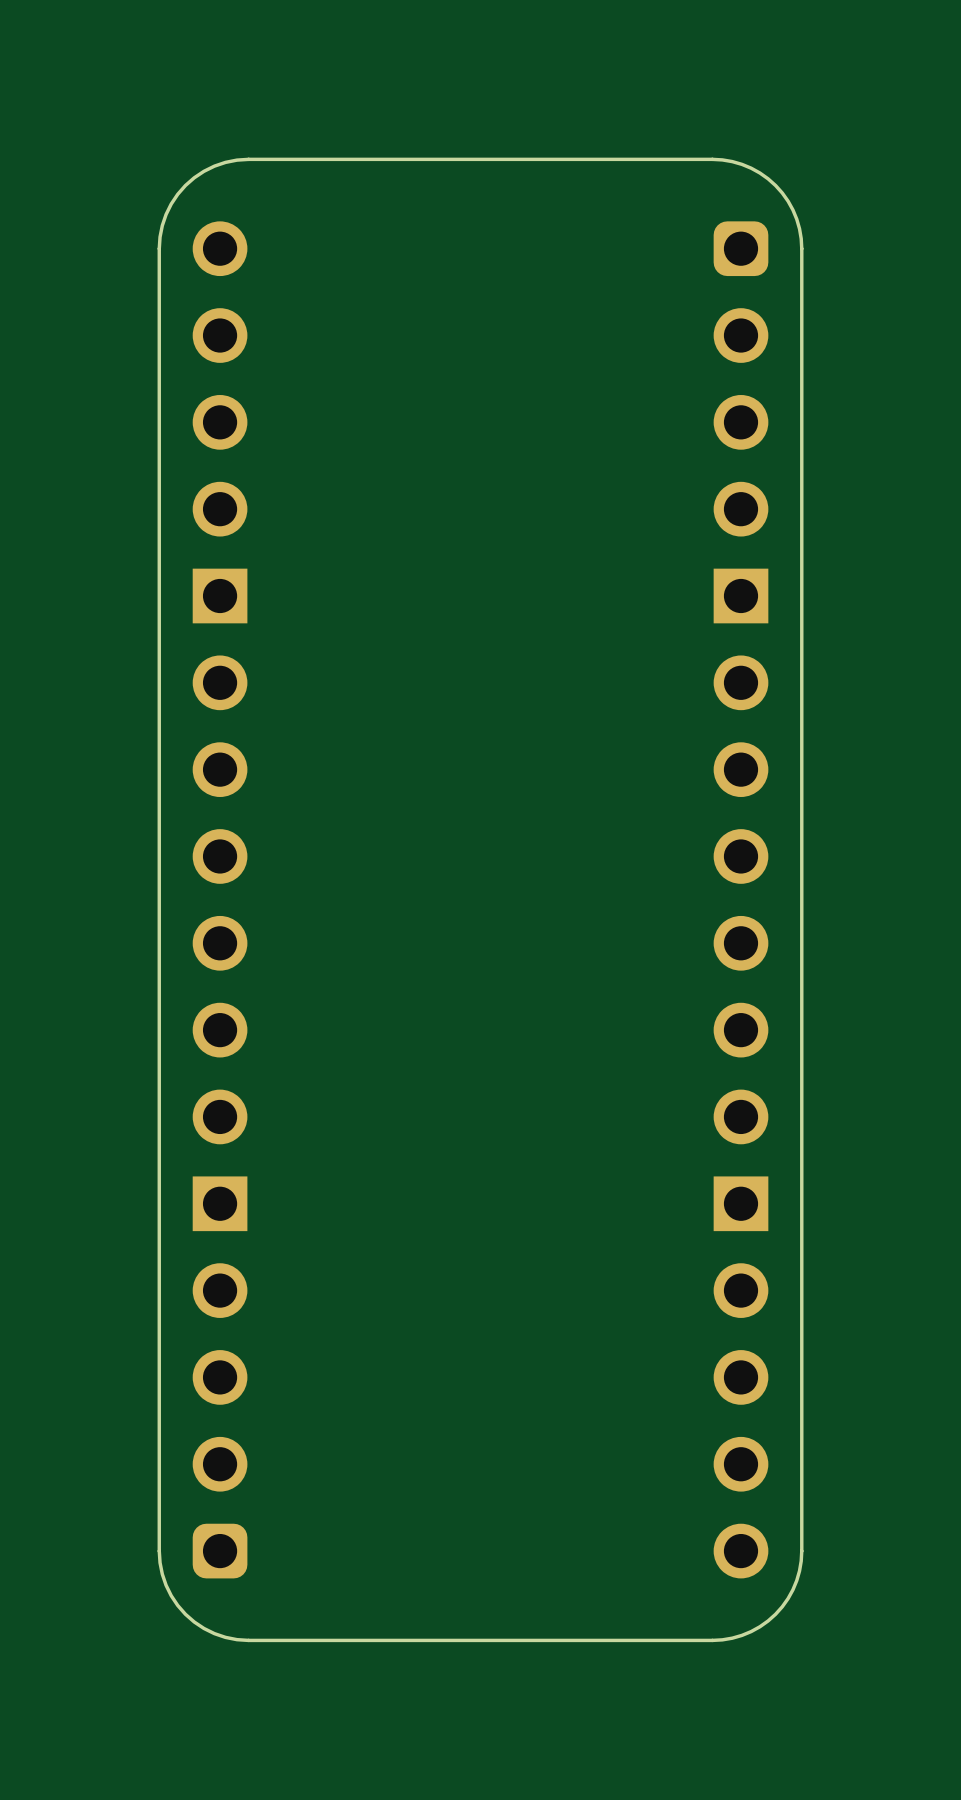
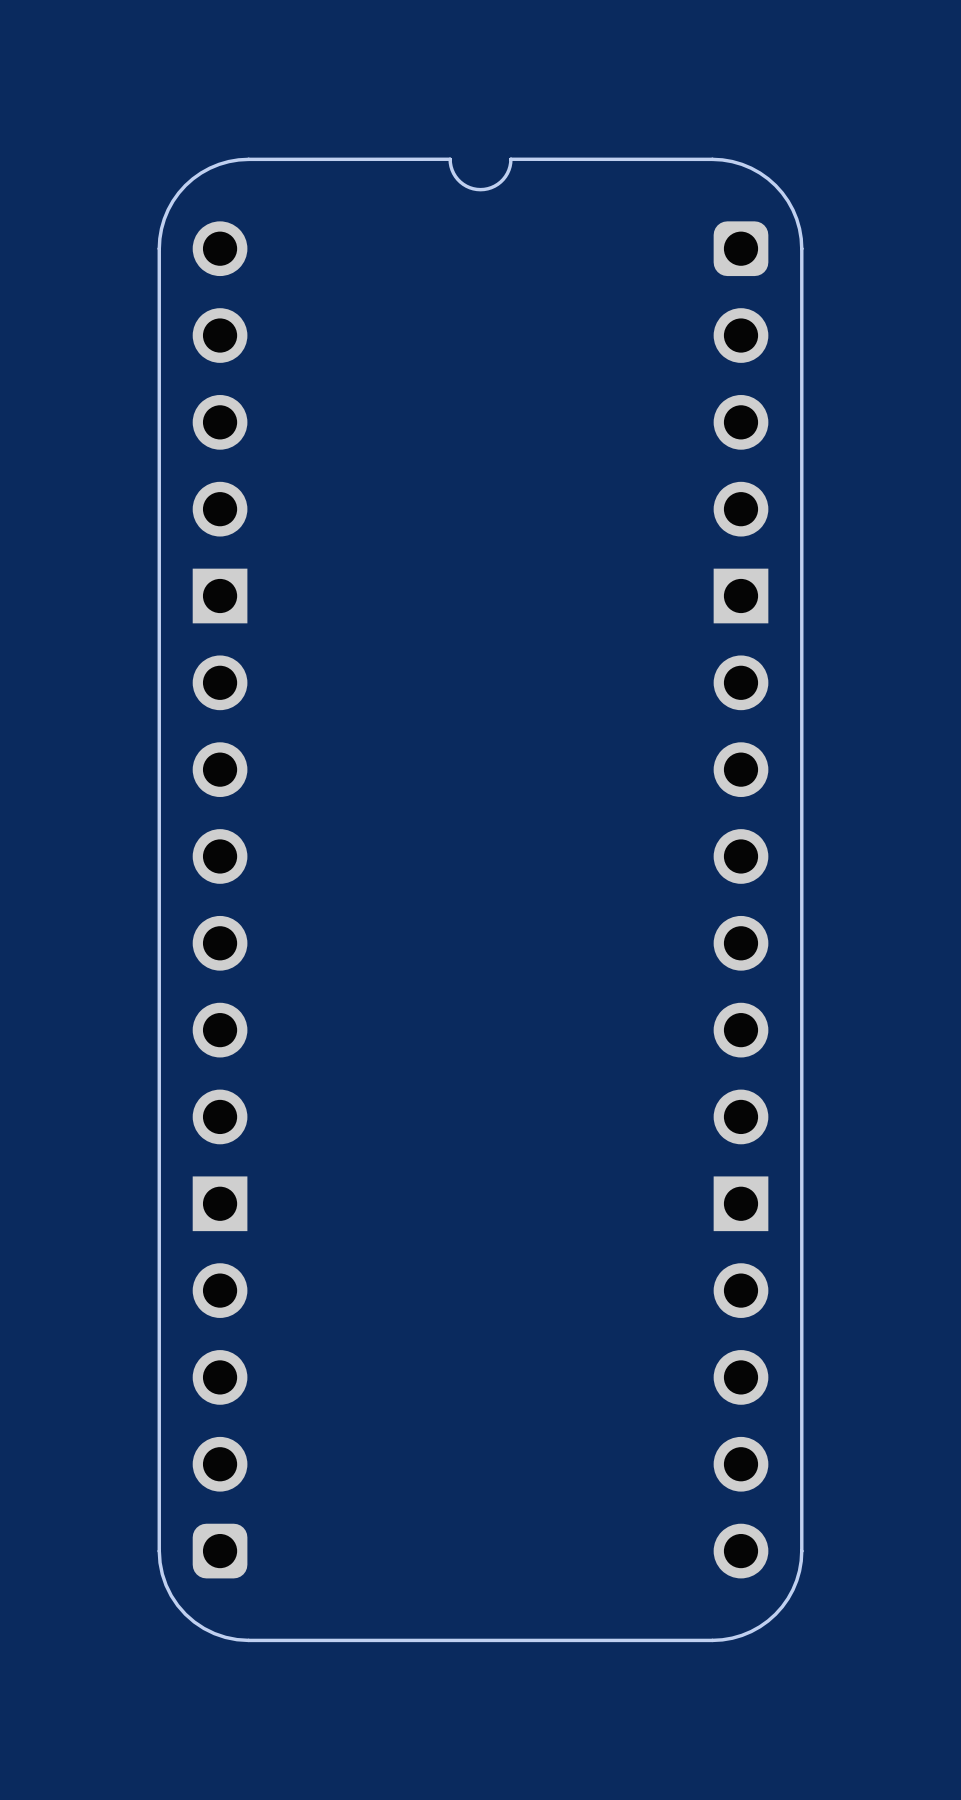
part footprint: [157, 157, 804, 1643] -> [157, 157, 804, 1643]

